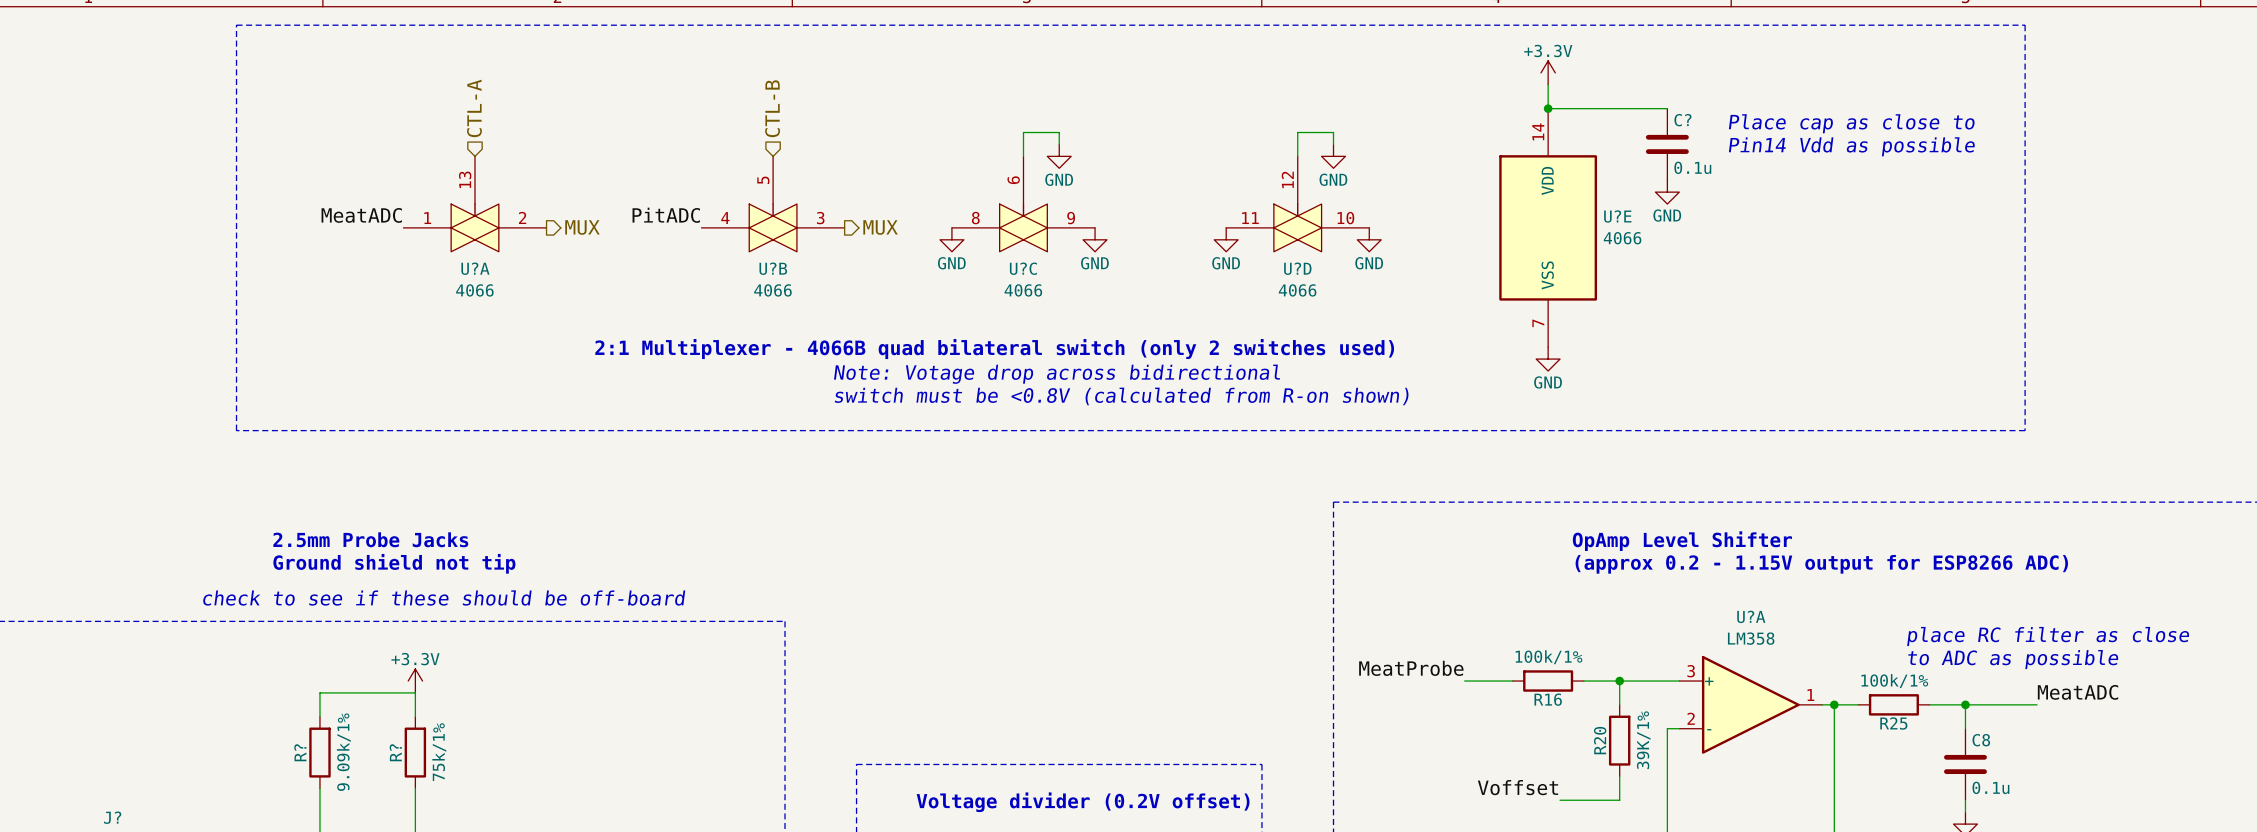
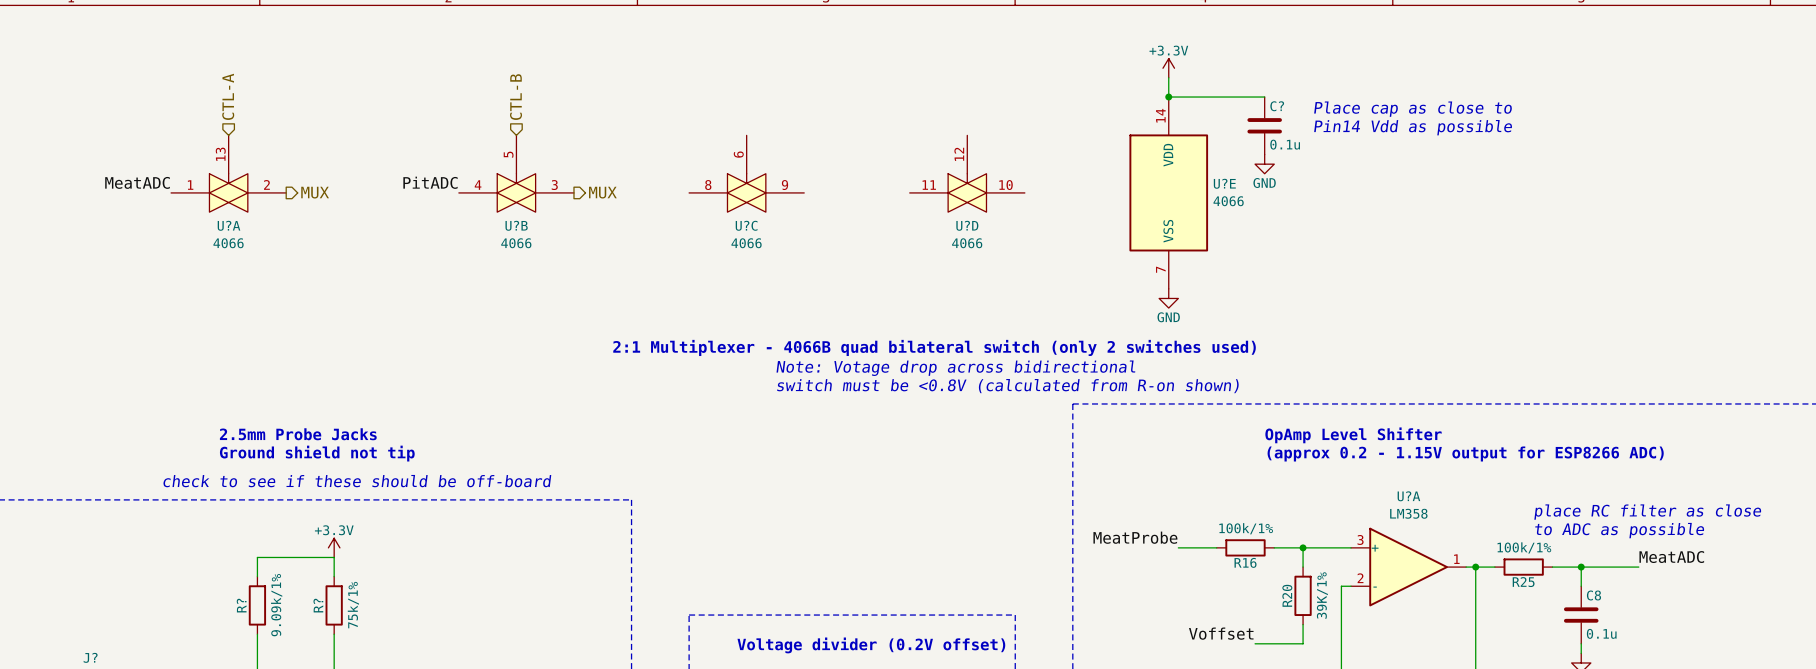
line: (236, 25) (2025, 25) (2025, 430) (236, 430) (236, 25) -> none
power symbol position: +3.3V (1548, 72) -> +3.3V (1168, 68)
wire: (1548, 84) (1548, 108) (1667, 108) -> (1168, 77) (1168, 97) (1264, 97)
hierarchical label position: CTL-A (474, 108) -> CTL-A (228, 96)
hierarchical label position: CTL-B (772, 108) -> CTL-B (516, 97)
junction: (1548, 108) -> none
junction: none -> (1168, 97)
text position: Place cap as close to (1851, 123) -> Place cap as close to (1413, 109)
wire: (1059, 144) (1059, 132) (1023, 132) (1023, 156) -> none
wire: (1333, 144) (1333, 132) (1297, 132) (1297, 156) -> none
C? position: (1667, 144) -> (1264, 125)
text position: Pin14 Vdd as possible (1851, 146) -> Pin14 Vdd as possible (1413, 127)
power symbol: GND (1059, 156) -> none
power symbol: GND (1333, 156) -> none
power symbol: GND (1667, 192) -> none
U?A position: (474, 204) -> (228, 173)
U?B position: (773, 204) -> (516, 173)
U?C position: (1023, 204) -> (746, 173)
U?D position: (1297, 204) -> (967, 173)
power symbol: none -> GND (1264, 164)
label position: MeatADC (361, 215) -> MeatADC (137, 182)
label position: PitADC (666, 215) -> PitADC (430, 182)
hierarchical label: MUX (582, 227) -> none
hierarchical label: MUX (880, 227) -> none
U?E position: (1548, 227) -> (1168, 192)
hierarchical label: none -> MUX (315, 192)
hierarchical label: none -> MUX (602, 192)
power symbol: GND (951, 239) -> none
power symbol: GND (1095, 239) -> none
power symbol: GND (1226, 239) -> none
power symbol: GND (1369, 239) -> none
text position: 2:1 Multiplexer - 4066B quad bilateral switch (only 2 switches used) (994, 349) -> 2:1 Multiplexer - 4066B quad bilateral switch (only 2 switches used) (934, 347)
power symbol: GND (1548, 359) -> none
power symbol: none -> GND (1168, 298)
text position: Note: Votage drop across bidirectional (1057, 374) -> Note: Votage drop across bidirectional (955, 368)
text position: switch must be <0.8V (calculated from R-on shown) (1121, 396) -> switch must be <0.8V (calculated from R-on shown) (1007, 386)

